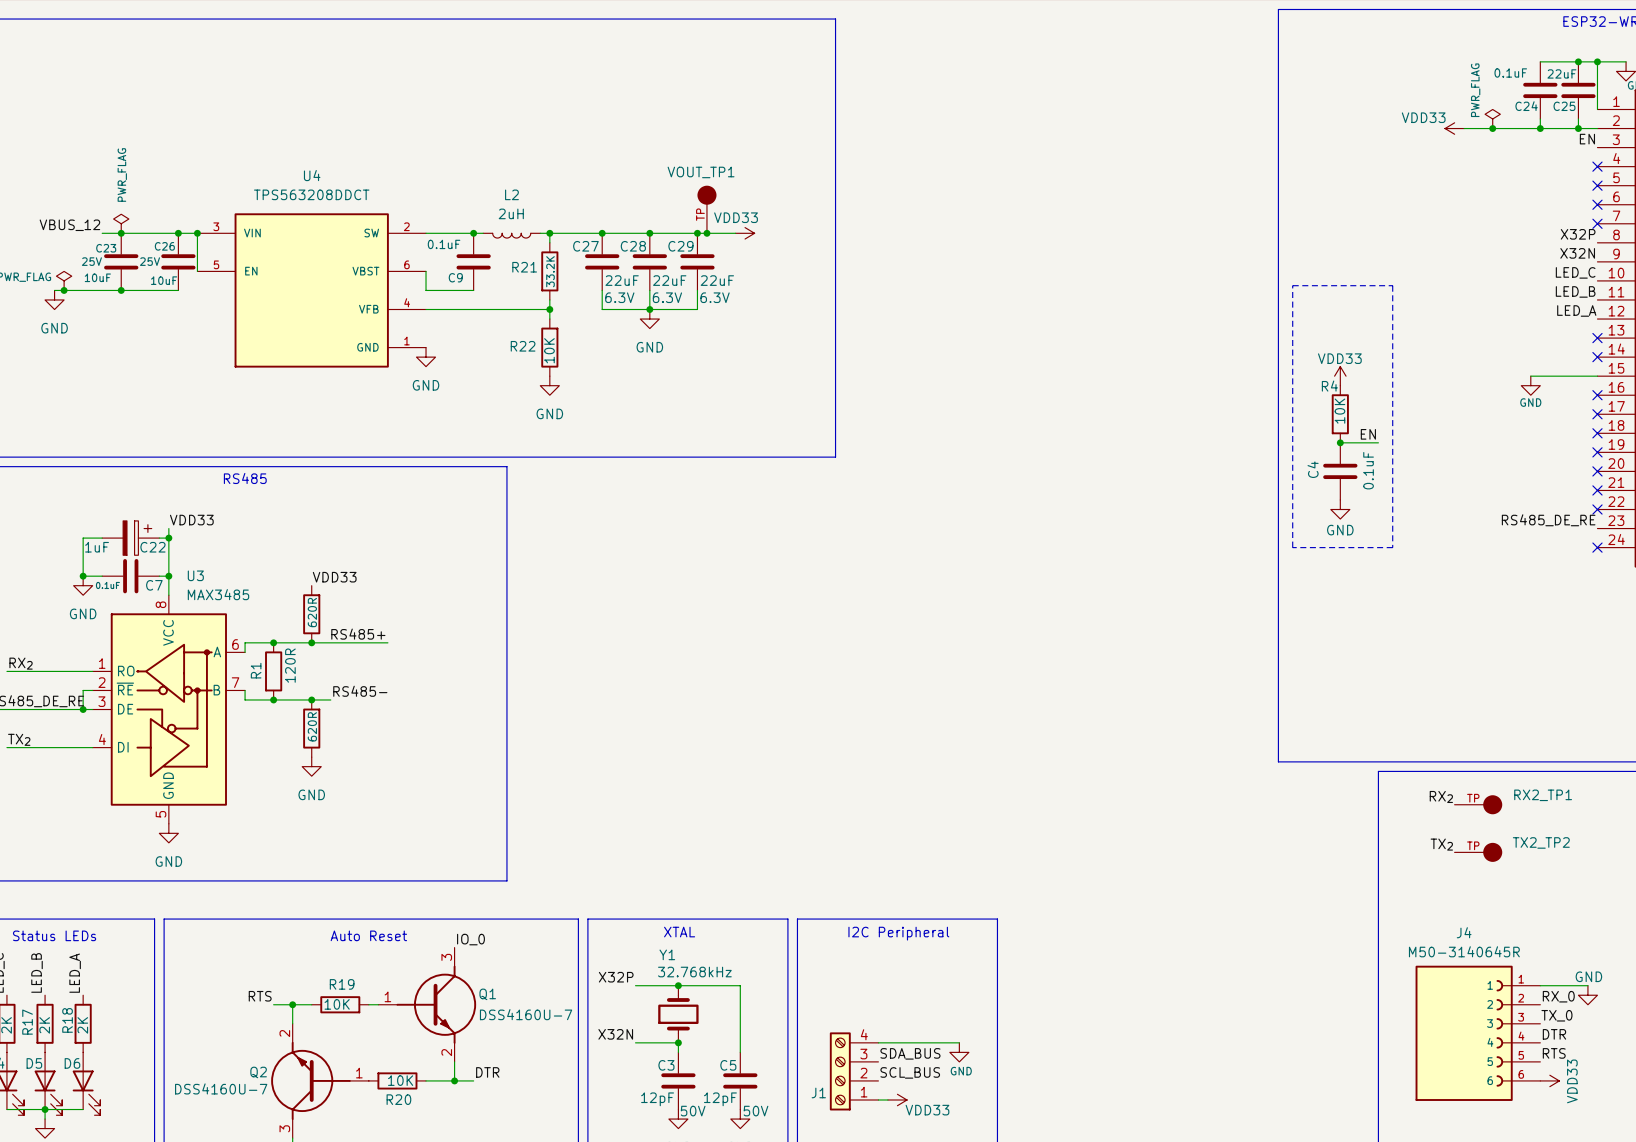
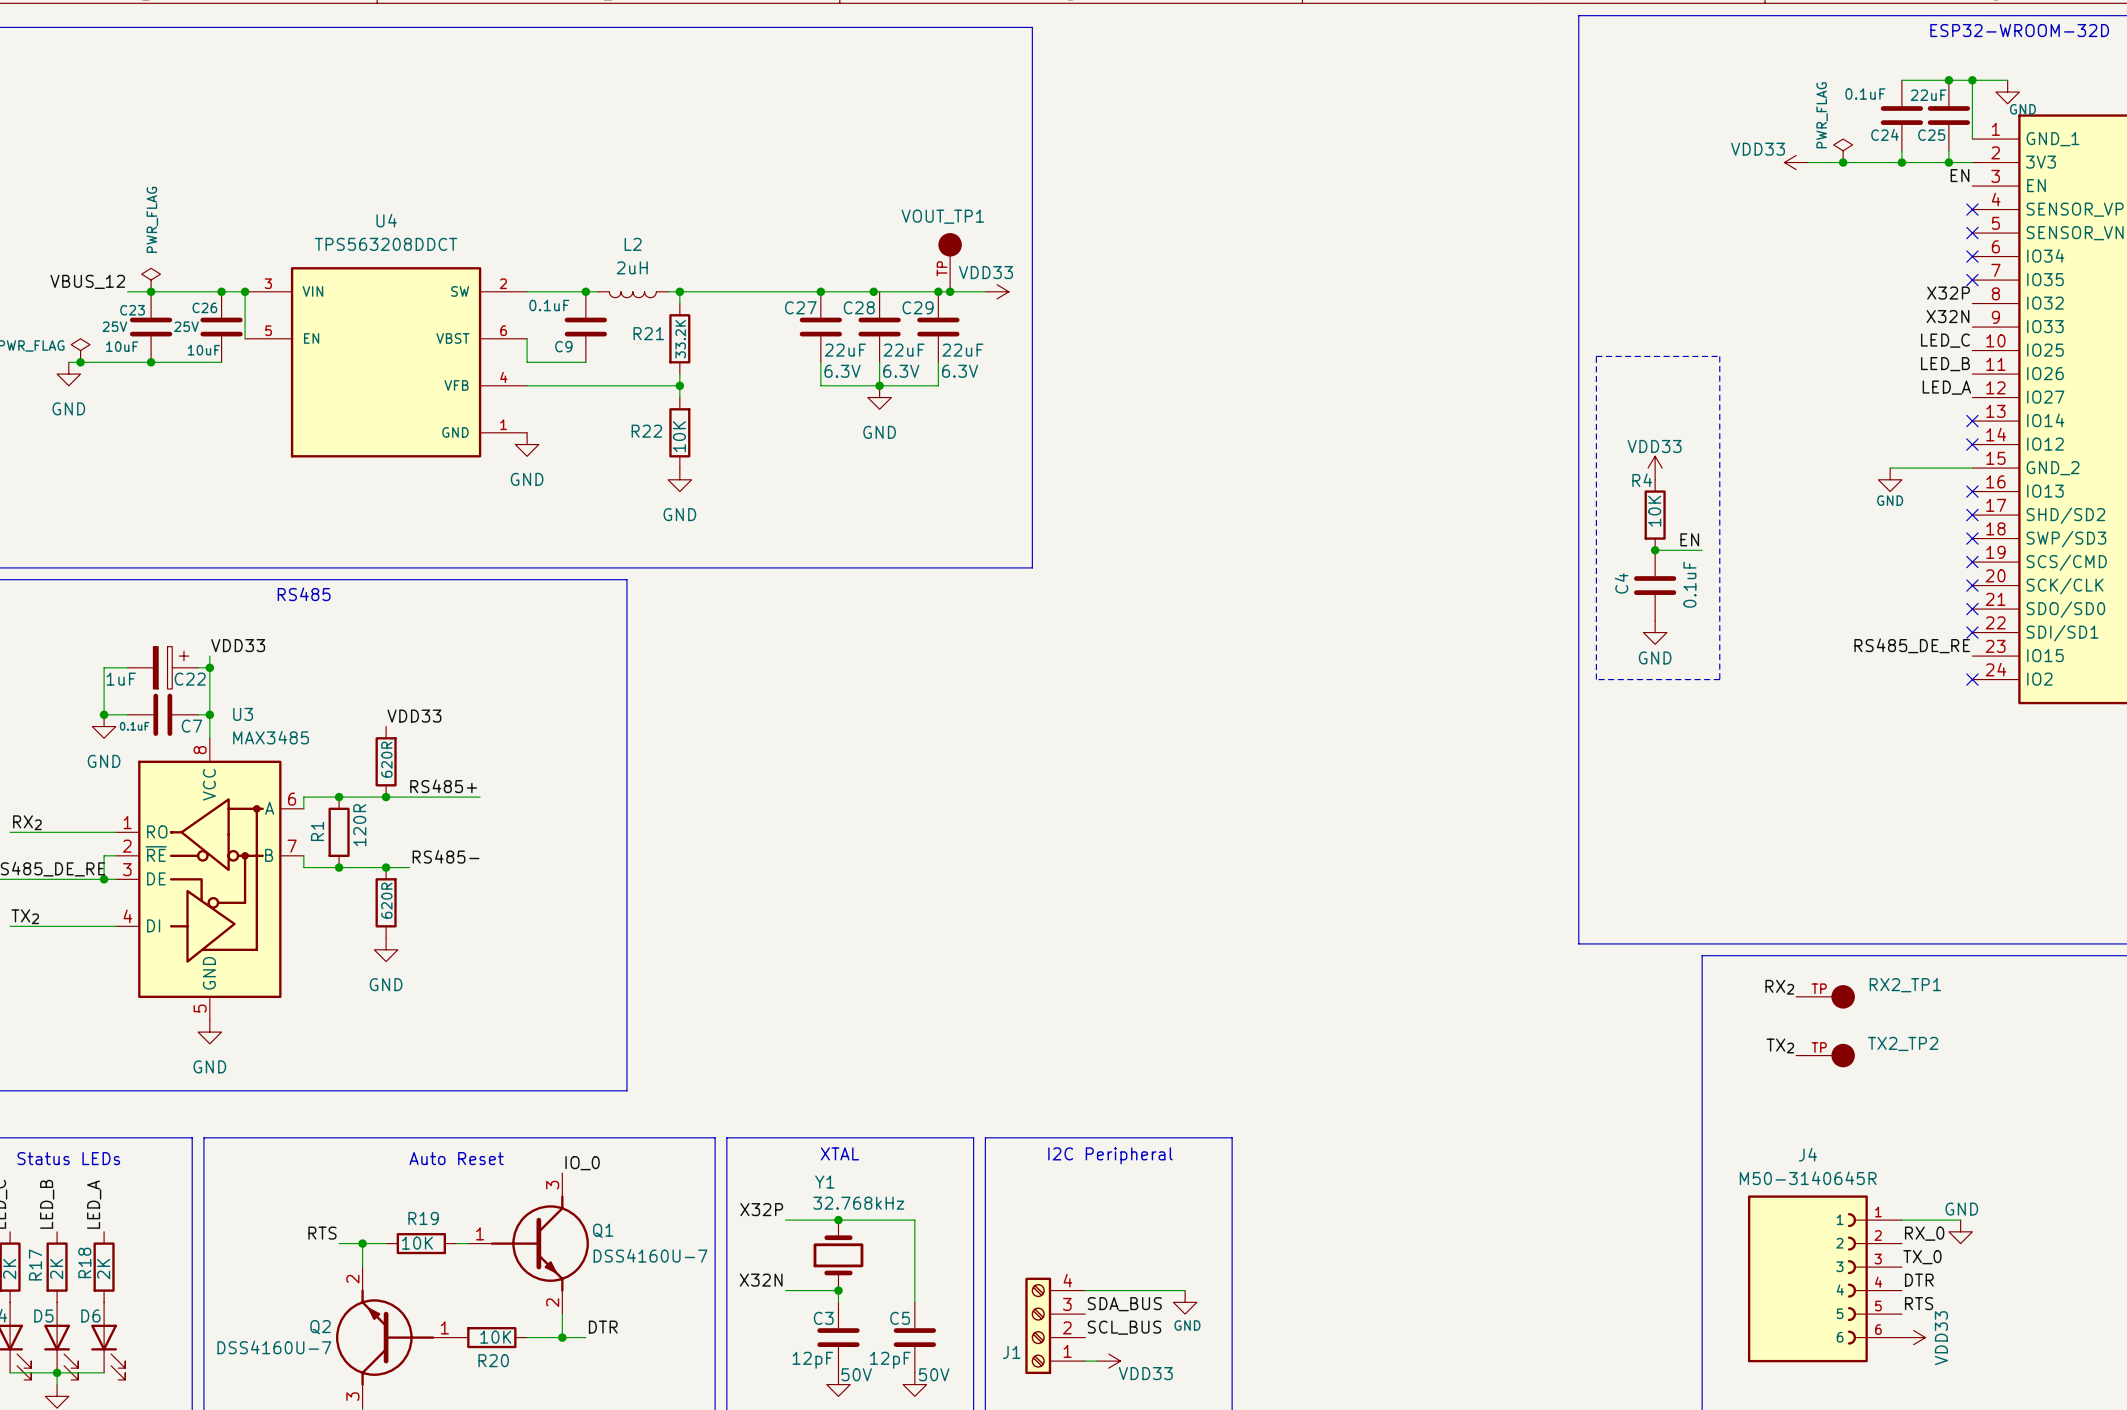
VOUT_TP1 position: (706, 209) -> (950, 262)
junction: (602, 233) -> none
junction position: (649, 233) -> (820, 291)
junction: (697, 233) -> none
wire: none -> (908, 291) (985, 291)
power symbol position: VDD33 (745, 233) -> VDD33 (997, 291)
junction: none -> (938, 291)
junction: none -> (950, 291)
C27 position: (602, 261) -> (820, 327)
C28 position: (649, 261) -> (879, 327)
C29 position: (697, 261) -> (938, 327)
wire: (602, 290) (602, 309) (664, 309) -> (820, 362) (820, 385)
wire: (649, 290) (649, 309) -> (879, 362) (879, 385)
wire: (697, 290) (697, 309) -> (938, 362) (938, 385) (861, 385)
junction: (649, 309) -> none
junction: none -> (879, 385)
power symbol position: GND (649, 319) -> GND (879, 397)

